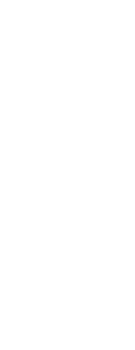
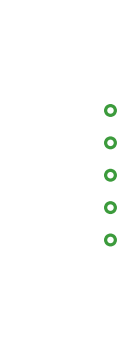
via: none -> (110, 110)
via: none -> (110, 142)
via: none -> (110, 175)
via: none -> (110, 207)
via: none -> (110, 239)

